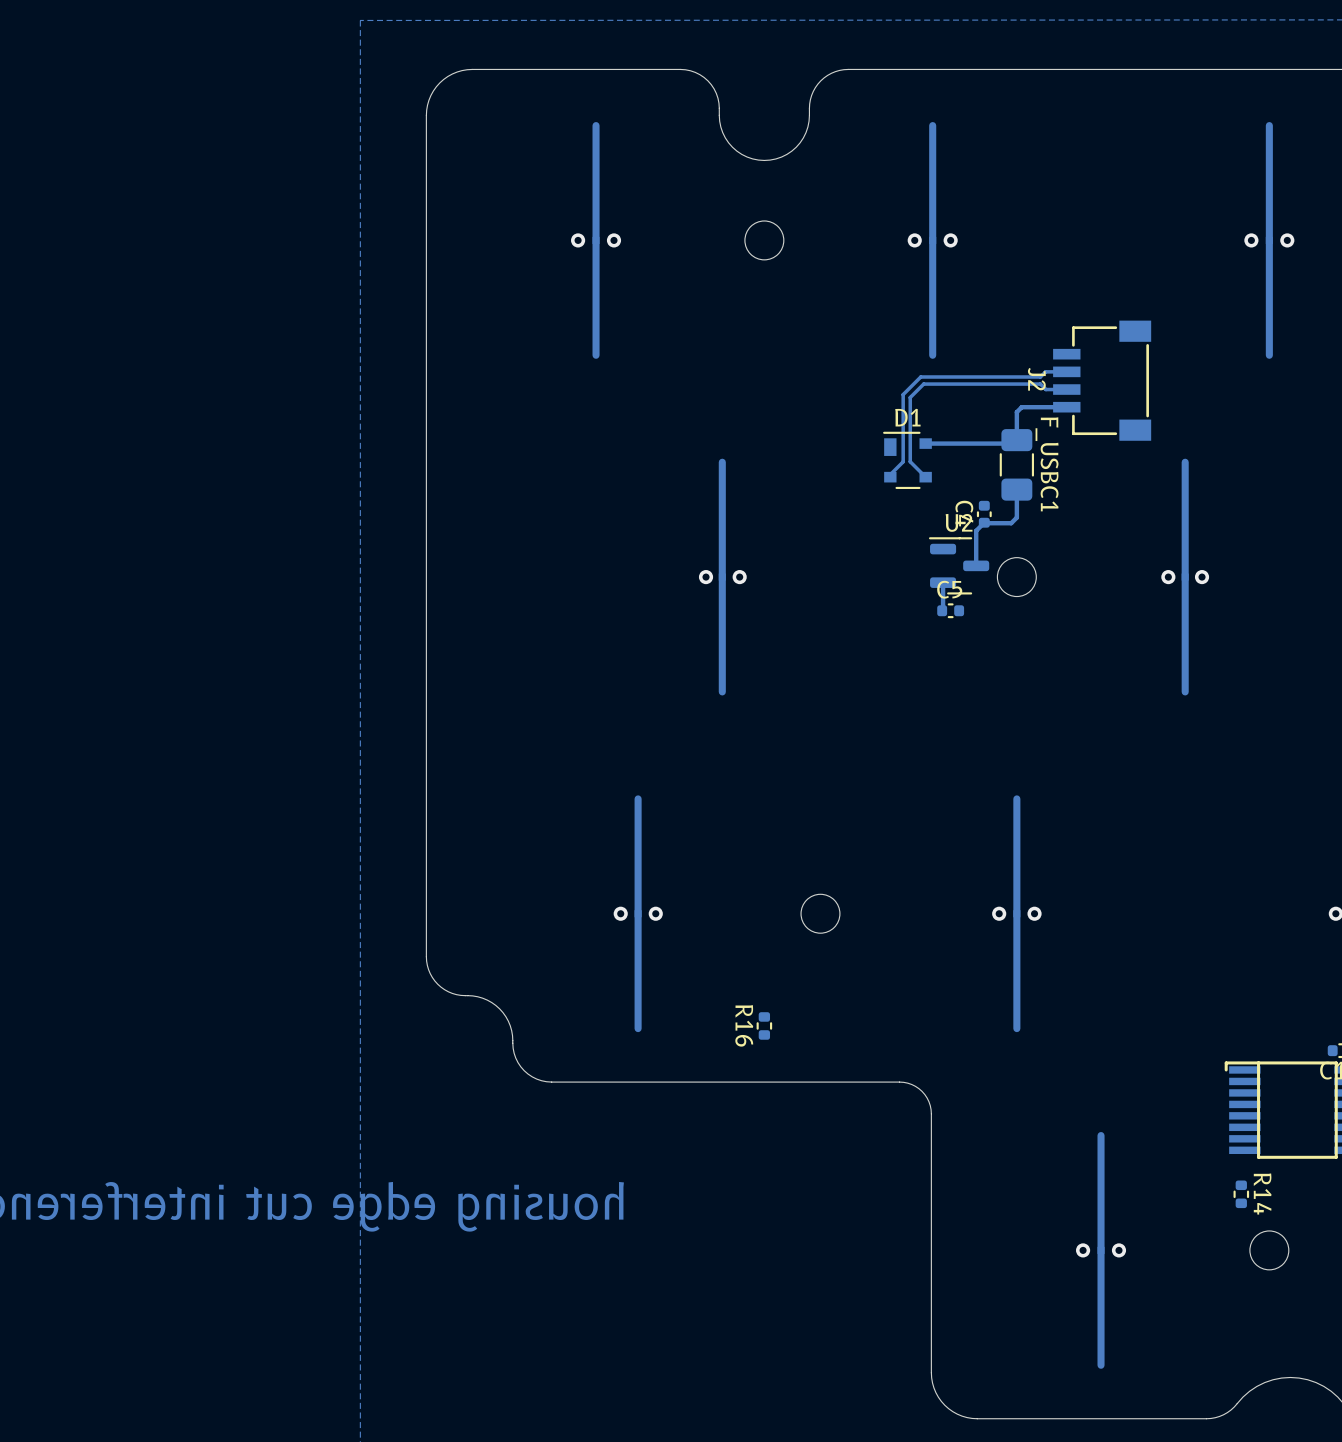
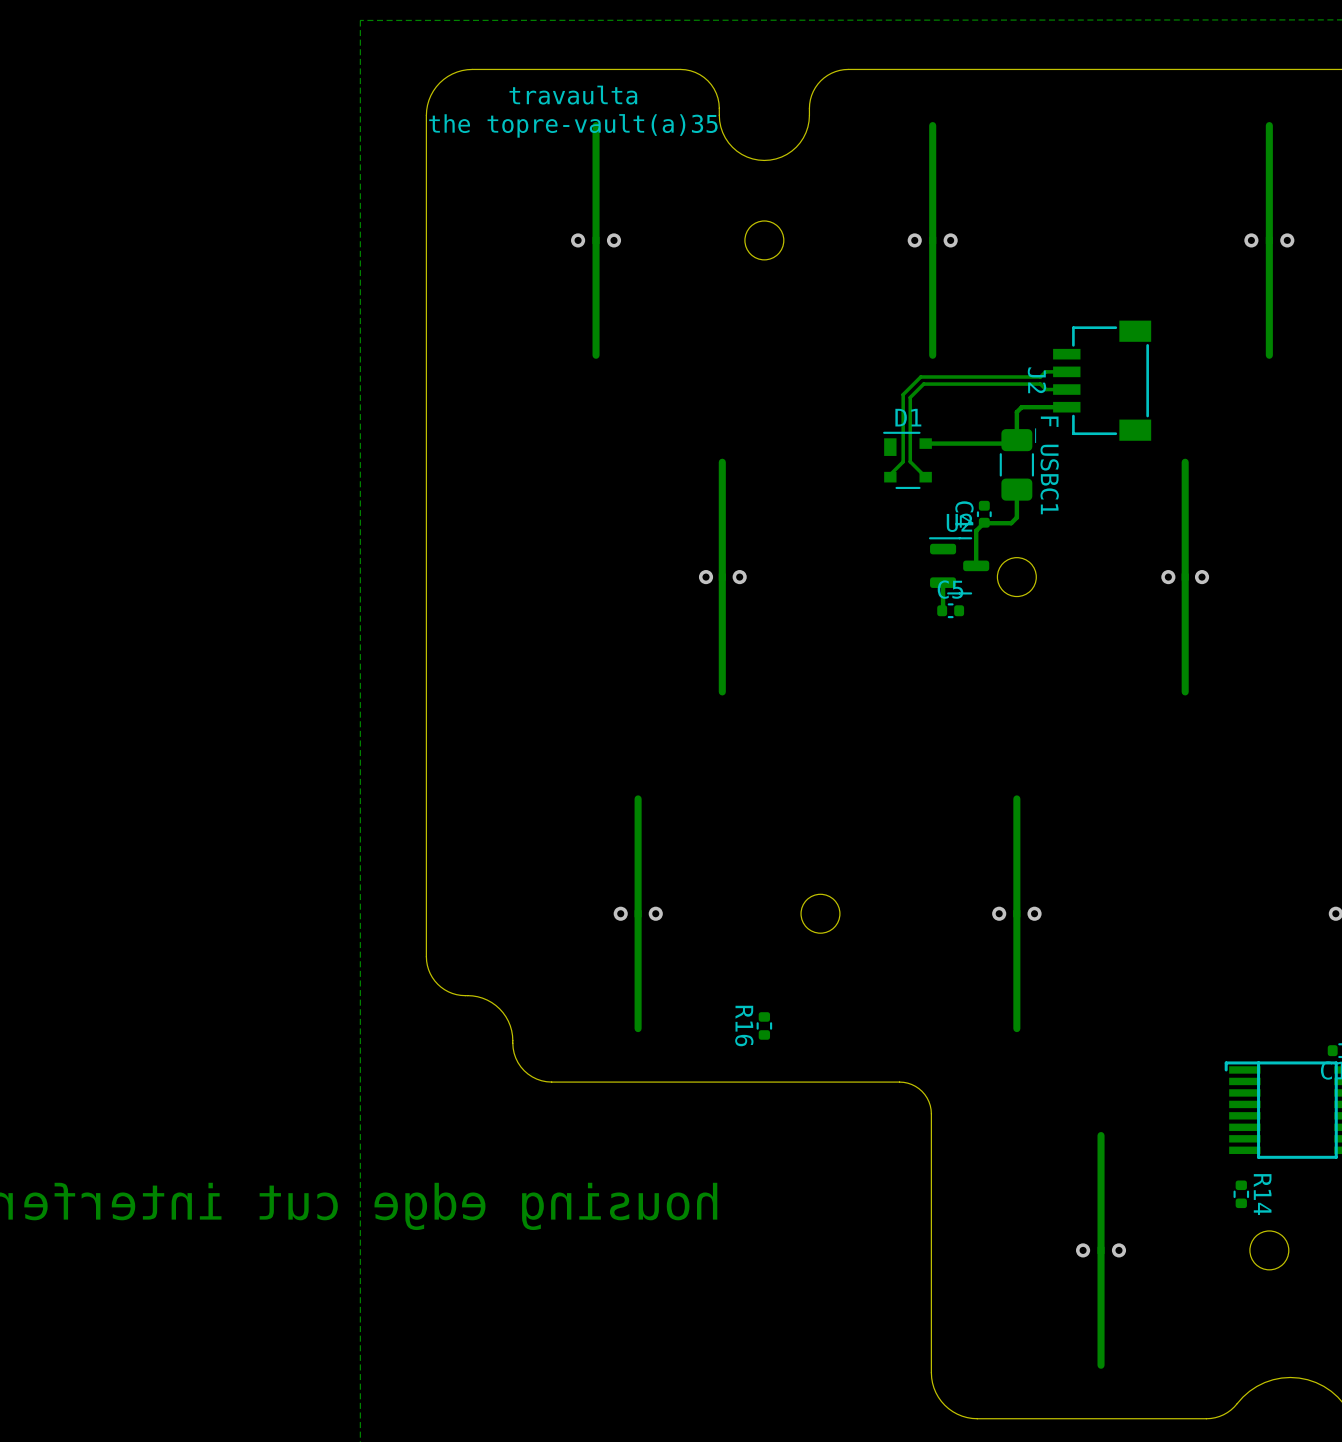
text: none -> travaulta (573, 95)
text: none -> the topre-vault(a)35 (573, 125)

